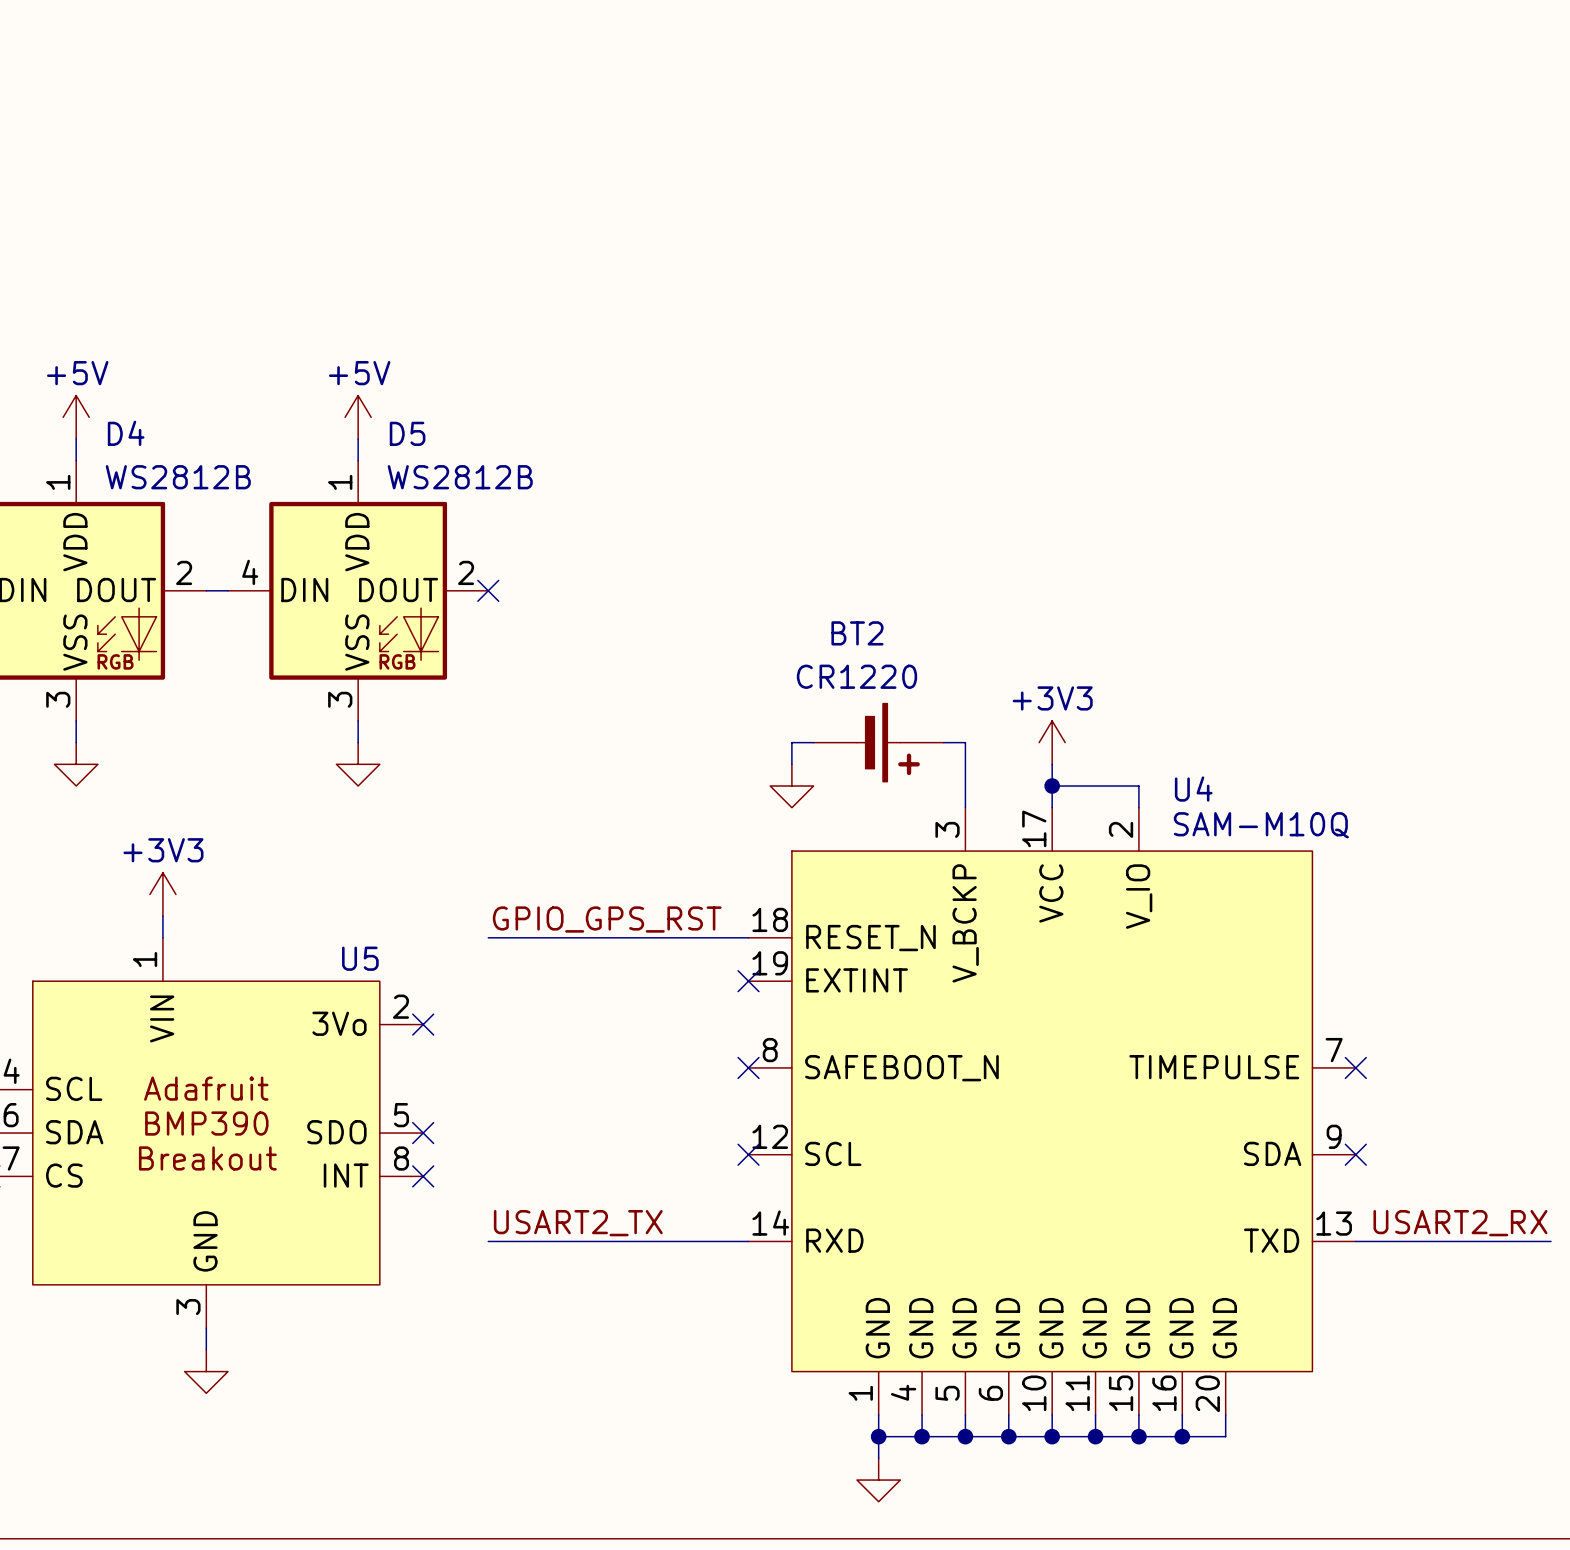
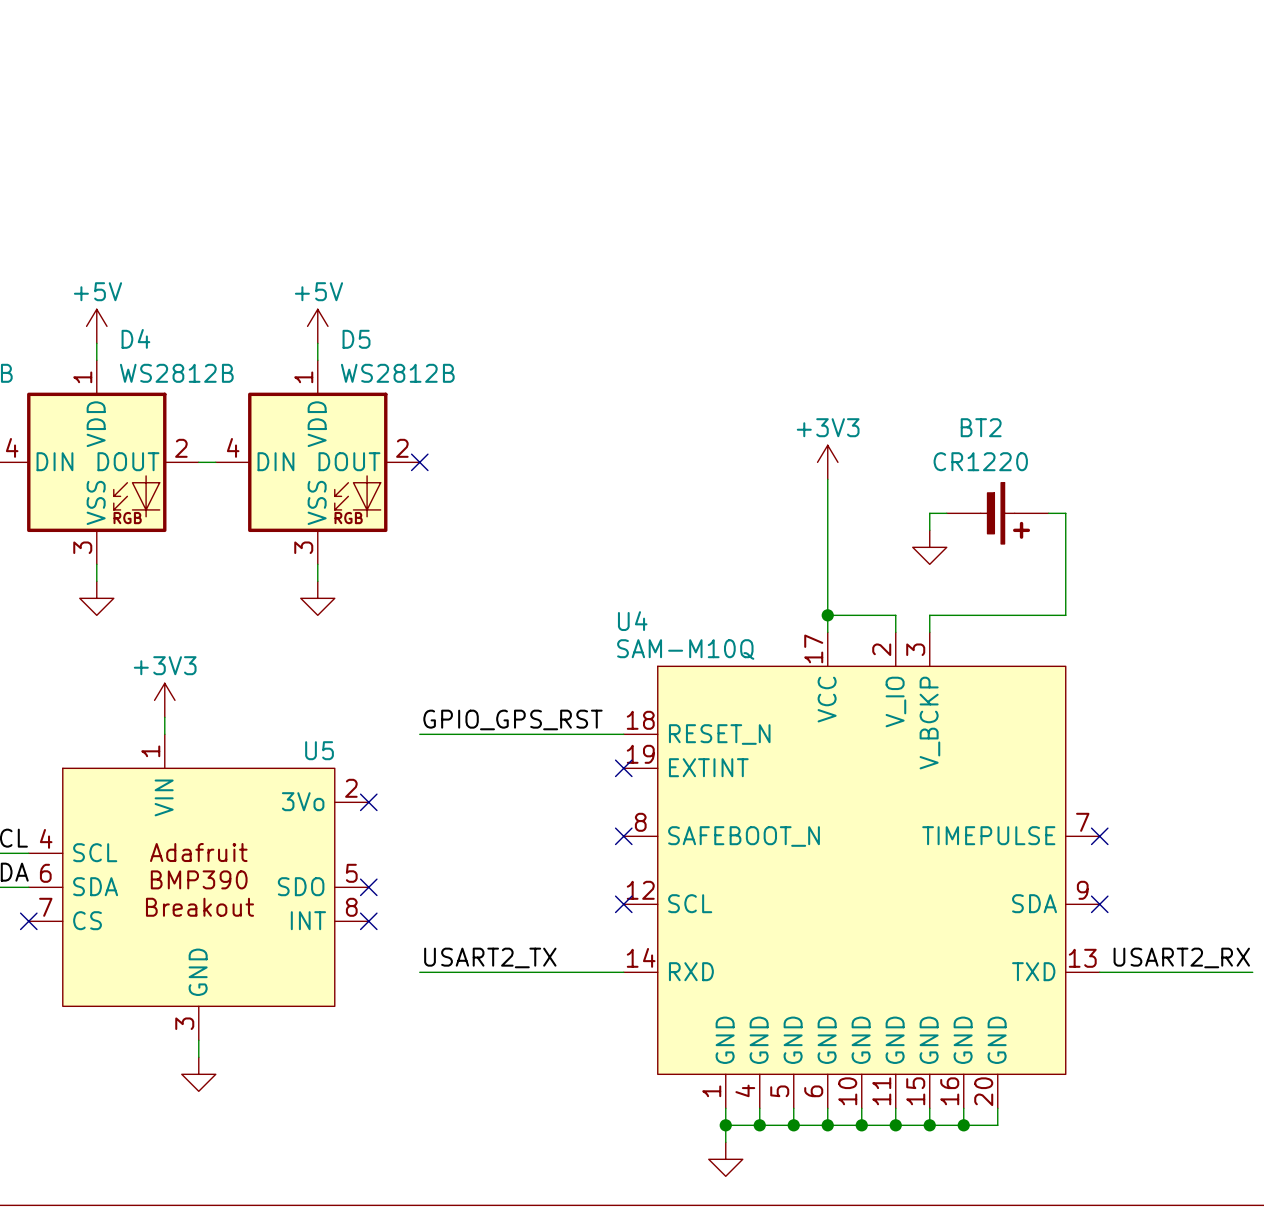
wire: none -> (827, 479) (827, 632)
wire: none -> (1048, 513) (1065, 513) (1065, 615) (929, 615)
wire: (813, 742) (791, 742) (791, 764) -> (946, 513) (929, 513) (929, 530)
BT2 position: (878, 742) -> (997, 513)
wire: (943, 742) (965, 742) (965, 807) -> none
power symbol position: +3V3 (1052, 742) -> +3V3 (827, 462)
wire: (1052, 764) (1052, 807) -> none
power symbol position: (791, 786) -> (929, 547)
wire: none -> (827, 615) (861, 615)
junction position: (1052, 786) -> (827, 615)
wire: (1095, 786) (1138, 786) -> (895, 615) (895, 632)
U4 name position: U4 (1193, 789) -> U4 (632, 621)
U4 symbol: [748, 807, 1356, 1415] -> [623, 632, 1100, 1109]
U4 value position: SAM-M10Q (1261, 825) -> SAM-M10Q (685, 649)

